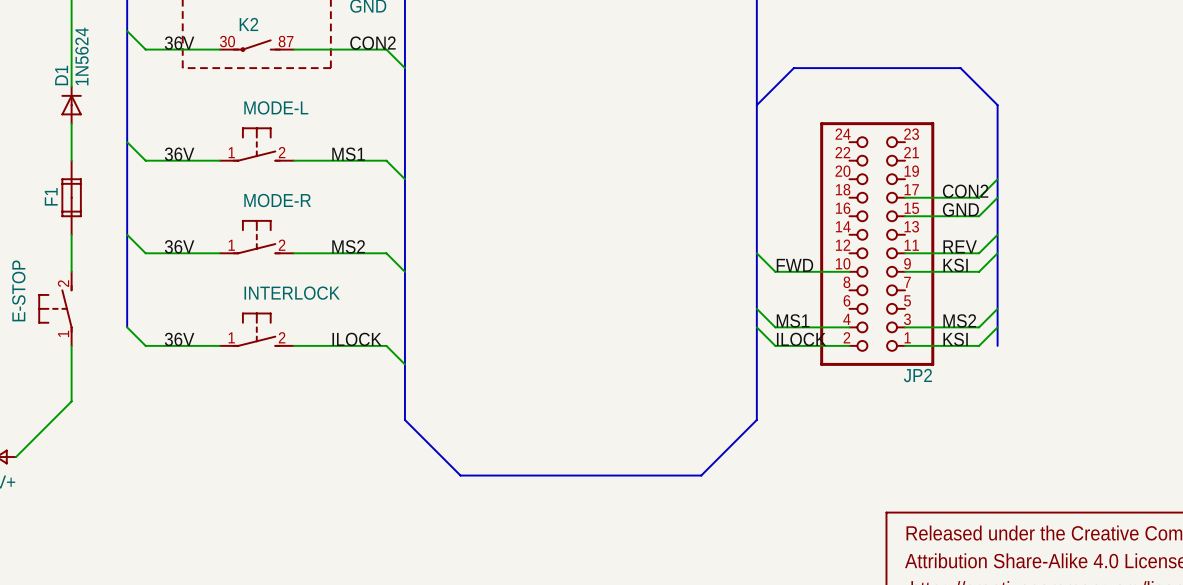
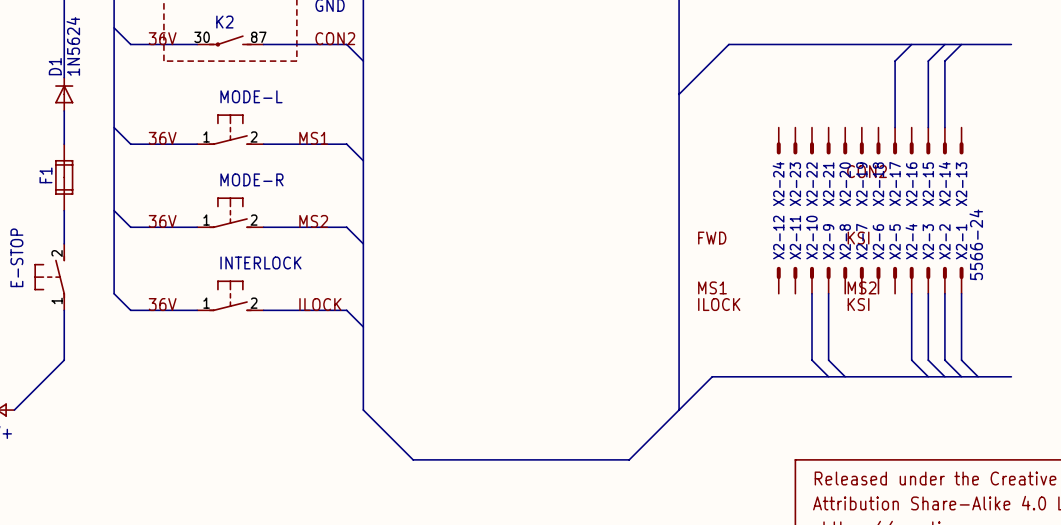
wire: none -> (911, 44) (895, 61) (895, 127)
wire: none -> (944, 44) (928, 61) (928, 127)
wire: none -> (961, 44) (944, 61) (944, 127)
bus: (793, 68) (960, 68) (997, 105) (997, 345) -> (712, 61) (728, 44) (1011, 44)
X2-24: none -> (778, 141)
X2-23: none -> (795, 141)
X2-22: none -> (812, 141)
X2-21: none -> (828, 141)
X2-20: none -> (845, 141)
X2-19: none -> (861, 141)
X2-18: none -> (878, 141)
X2-17: none -> (895, 141)
X2-16: none -> (911, 141)
X2-15: none -> (928, 141)
X2-14: none -> (944, 141)
X2-13: none -> (961, 141)
wire: (997, 179) (979, 197) (905, 197) -> none
wire: (997, 197) (979, 216) (905, 216) -> none
label: GND (960, 209) -> none
wire: (997, 234) (979, 253) (905, 253) -> none
JP2: (877, 244) -> none
label: REV (960, 246) -> none
wire: (756, 253) (775, 271) (849, 271) -> none
wire: (997, 253) (979, 271) (905, 271) -> none
wire: (756, 308) (775, 327) (849, 327) -> none
wire: (997, 308) (979, 327) (905, 327) -> (828, 376) (812, 360) (812, 293)
X2-12: none -> (778, 280)
X2-11: none -> (795, 280)
X2-10: none -> (812, 280)
X2-9: none -> (828, 280)
X2-8: none -> (845, 280)
X2-7: none -> (861, 280)
X2-6: none -> (878, 280)
X2-5: none -> (895, 280)
X2-4: none -> (911, 280)
X2-3: none -> (928, 280)
X2-2: none -> (944, 280)
X2-1: none -> 5566-24 (961, 280)
wire: (756, 327) (775, 345) (849, 345) -> none
wire: none -> (828, 293) (828, 360) (845, 376)
wire: (997, 327) (979, 345) (905, 345) -> none
wire: none -> (911, 293) (911, 360) (928, 376)
wire: none -> (928, 293) (928, 360) (944, 376)
wire: none -> (944, 293) (944, 360) (961, 376)
wire: none -> (961, 293) (961, 360) (978, 376)
bus: (404, 419) (460, 475) (701, 475) (756, 419) -> (679, 410) (679, 376)
bus: none -> (363, 376) (363, 410) (413, 459) (629, 459) (712, 376) (1011, 376)

